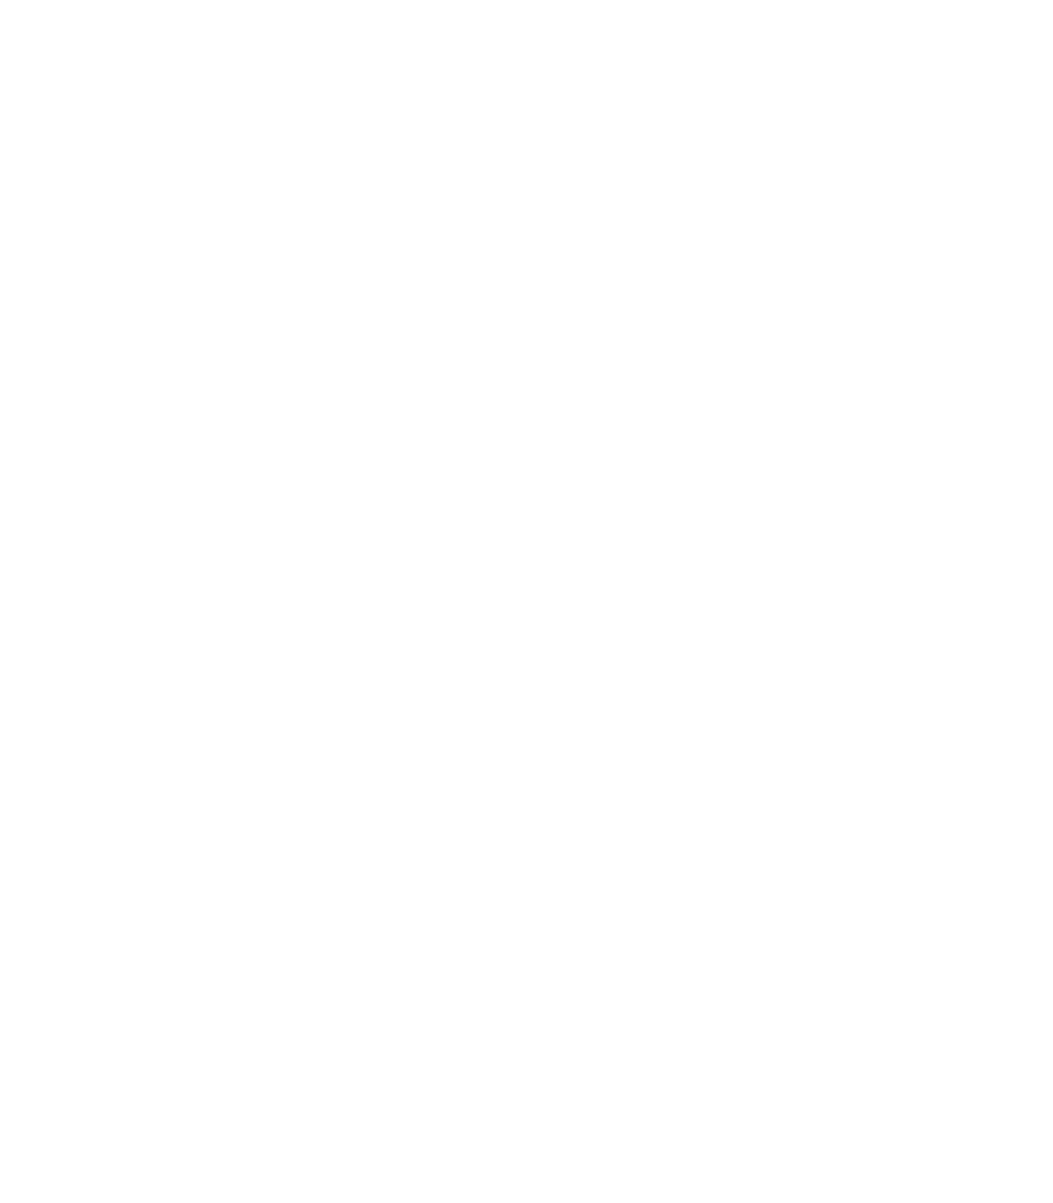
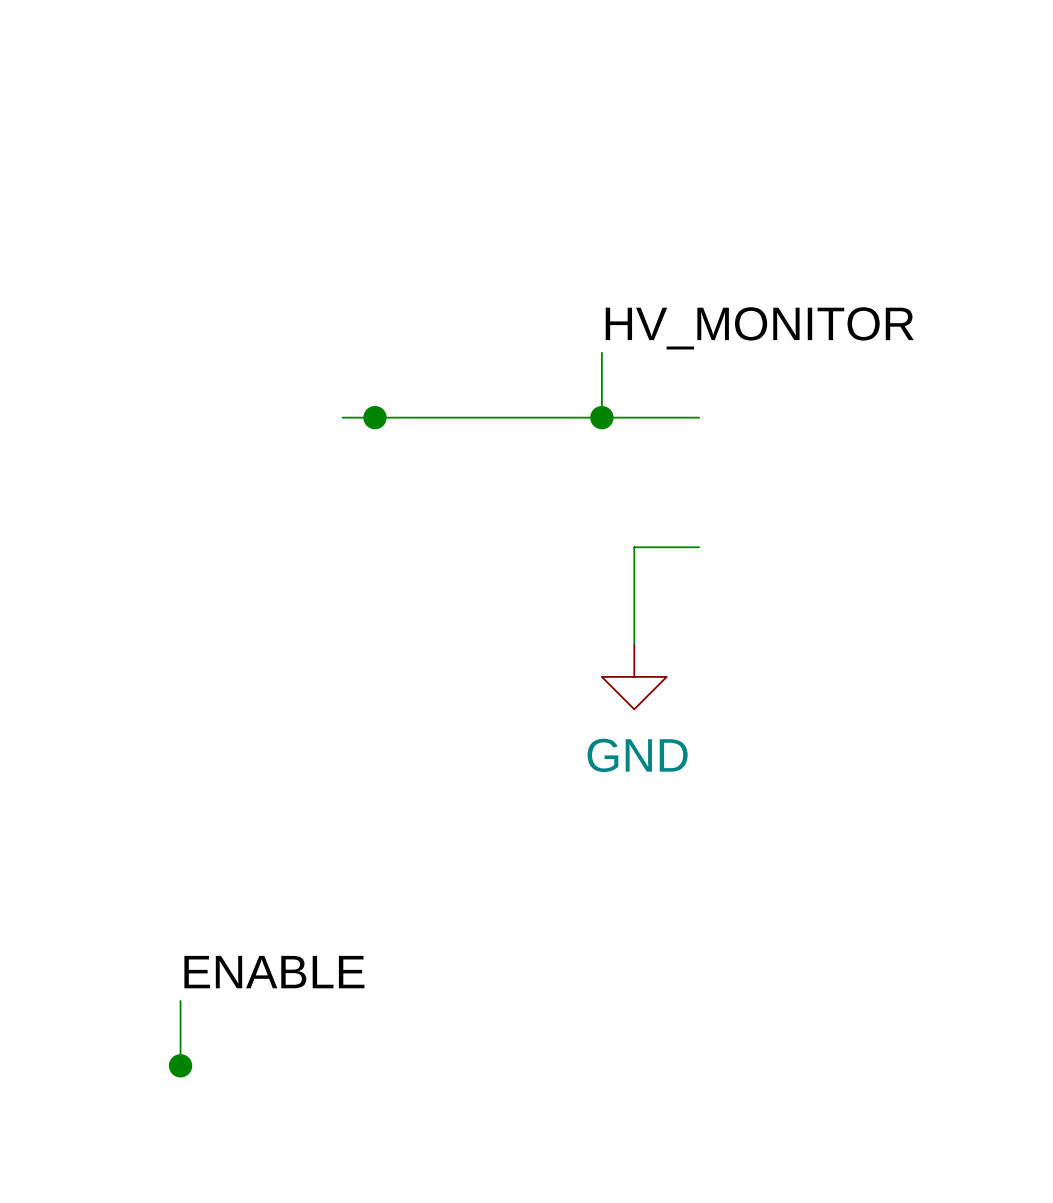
label: none -> HV_MONITOR (759, 328)
wire: none -> (601, 352) (601, 417)
wire: none -> (342, 417) (699, 417)
junction: none -> (375, 417)
junction: none -> (601, 417)
wire: none -> (699, 547) (634, 547) (634, 644)
power symbol: none -> GND (634, 676)
label: none -> ENABLE (274, 972)
wire: none -> (180, 1001) (180, 1065)
junction: none -> (180, 1065)

